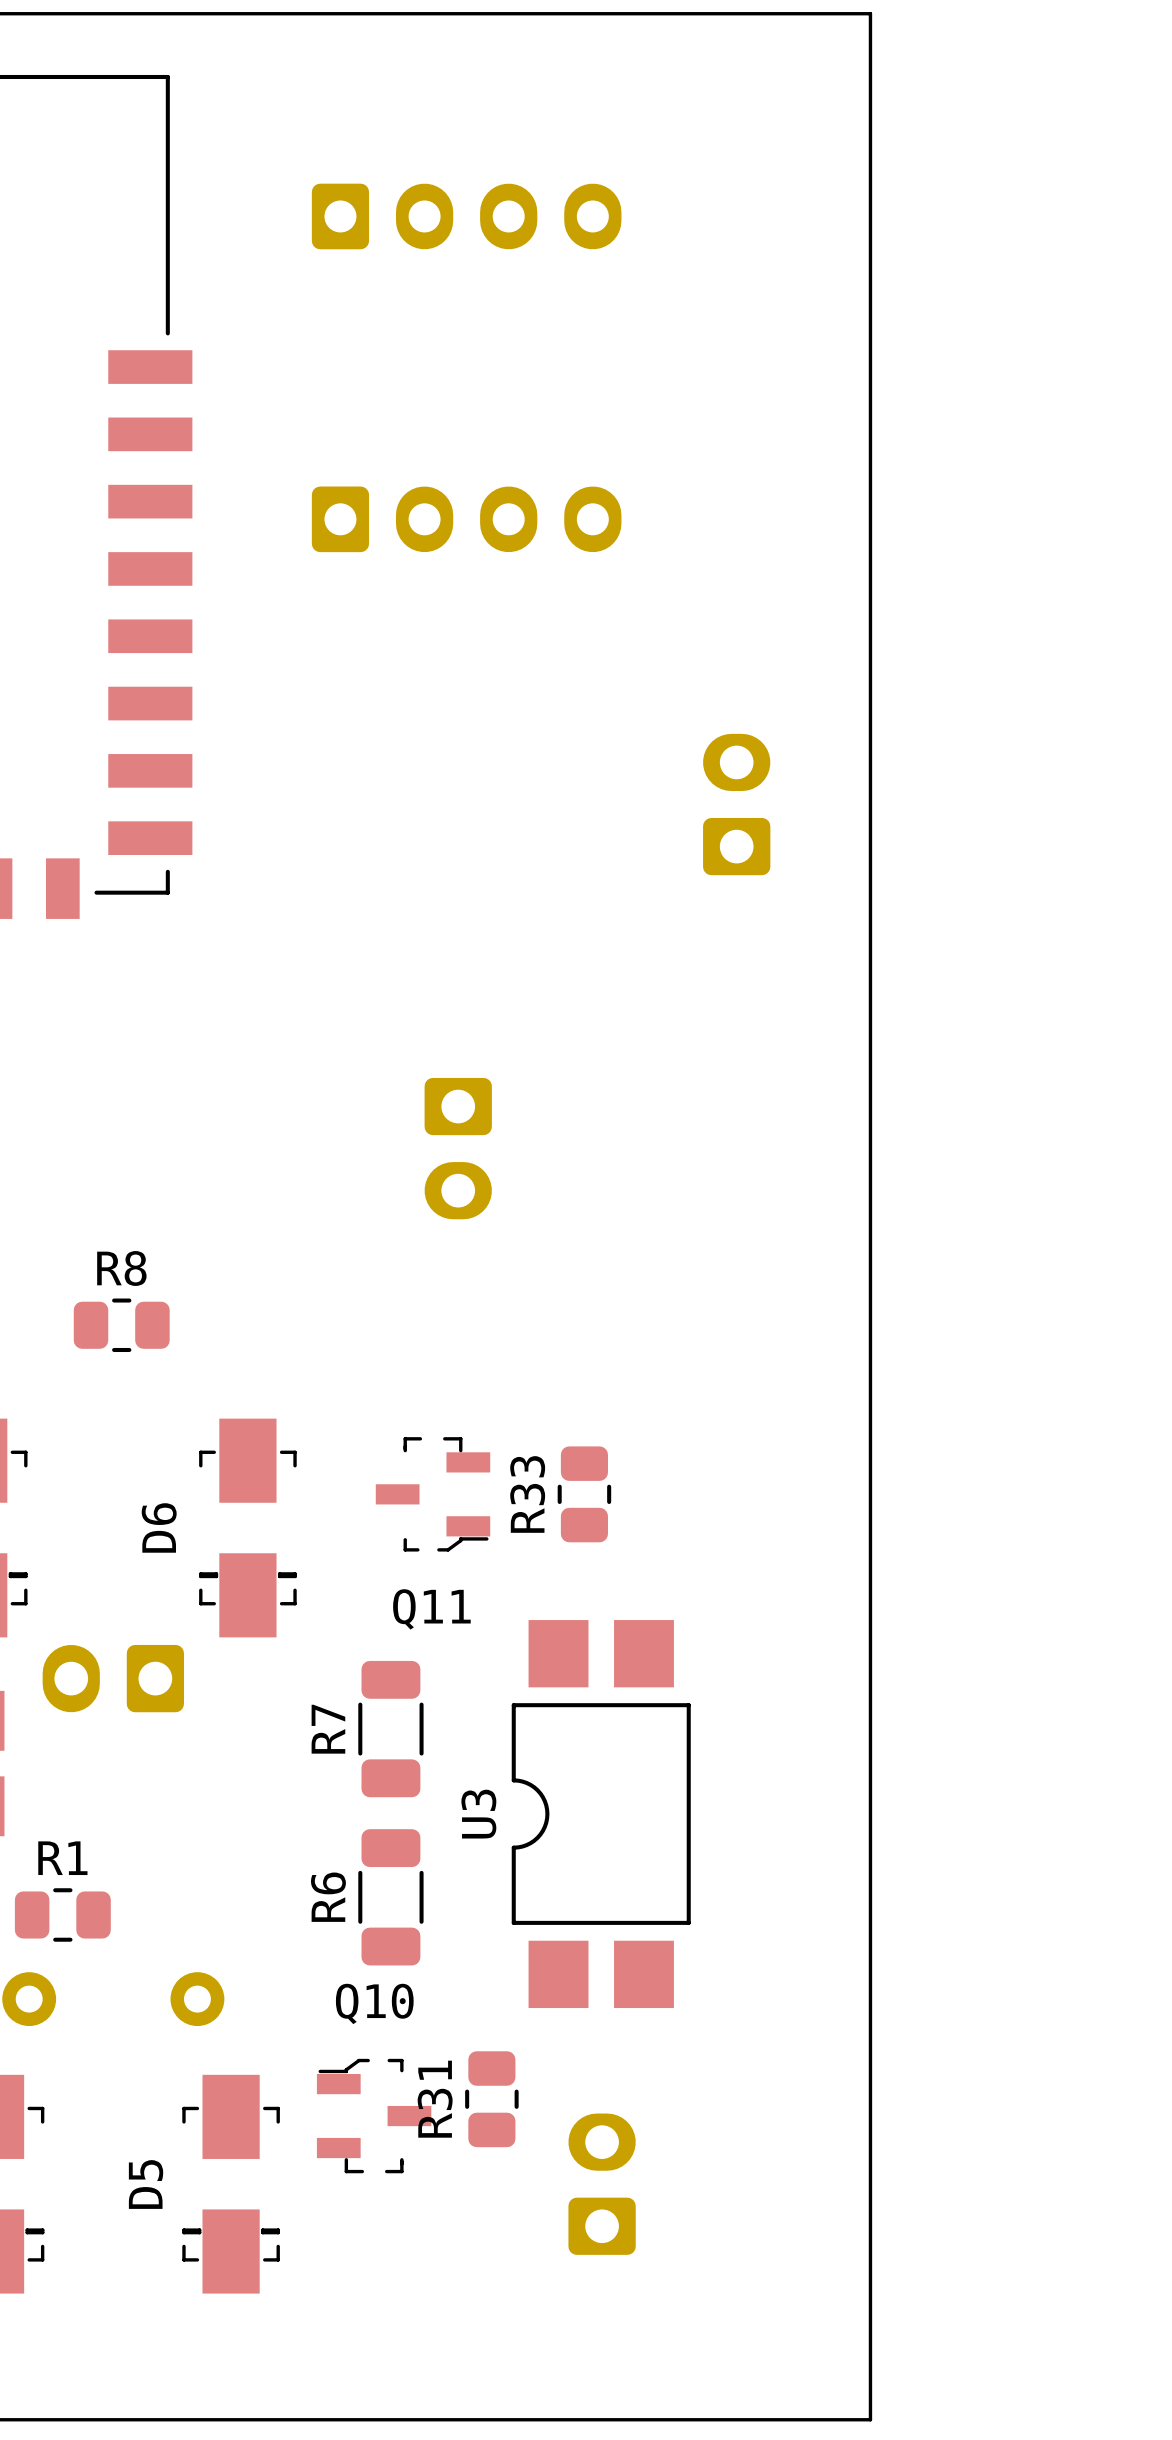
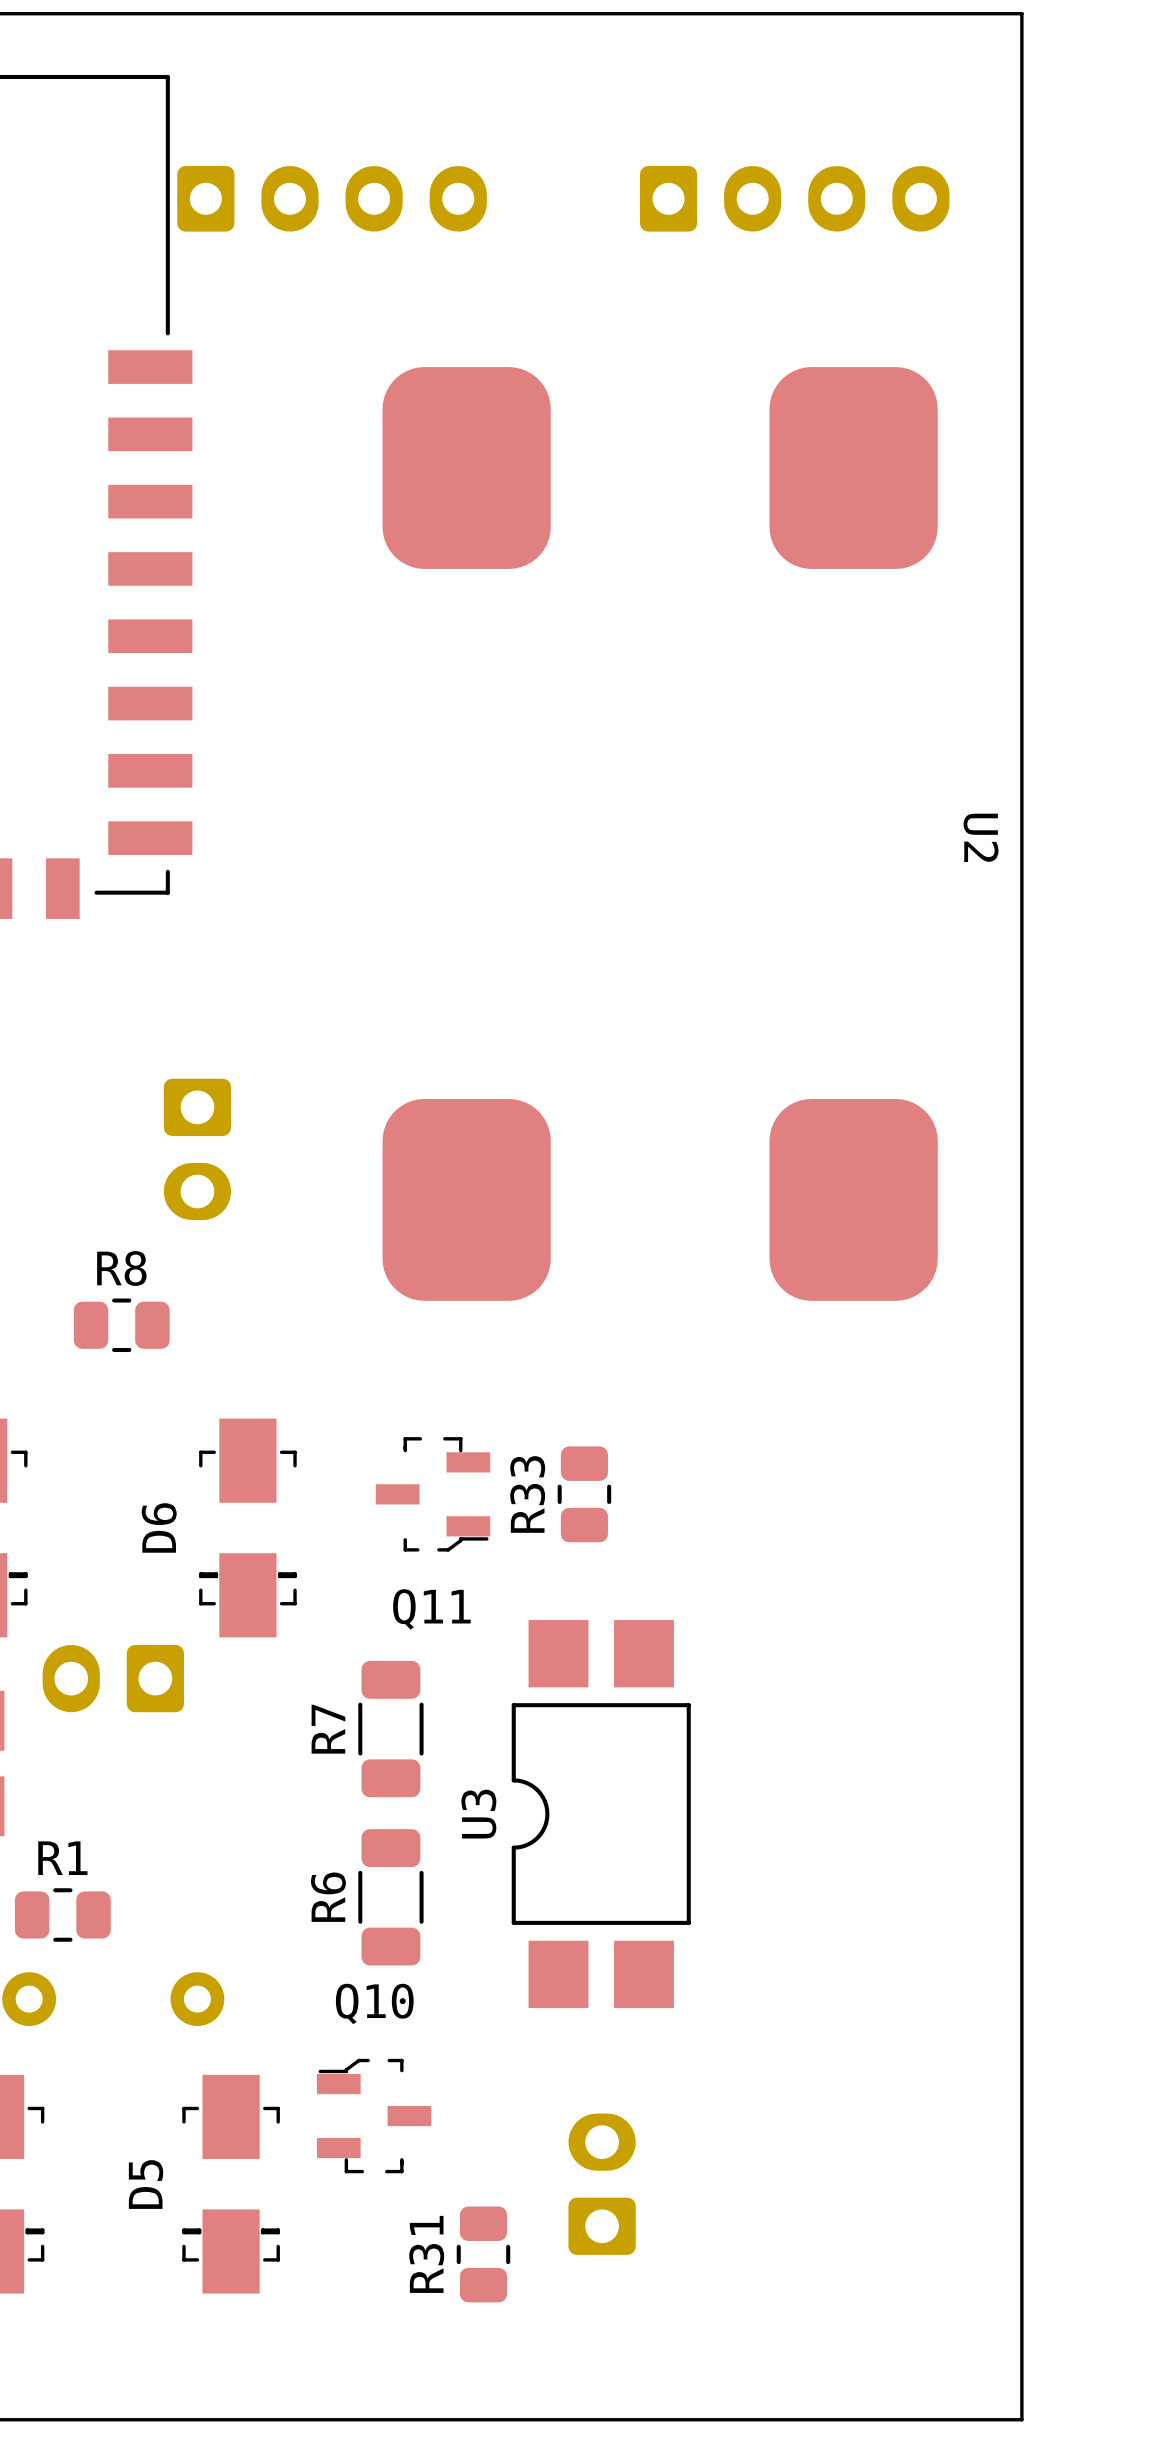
board edge: (870, 13) (870, 2419) -> (870, 13) (1021, 13) (1021, 2419) (870, 2419)
part: none -> (794, 198)
part position: (466, 216) -> (332, 198)
part: (466, 519) -> none
part: (736, 804) -> none
U2: none -> (660, 833)
part position: (458, 1148) -> (197, 1149)
R31 position: (491, 2099) -> (483, 2254)

